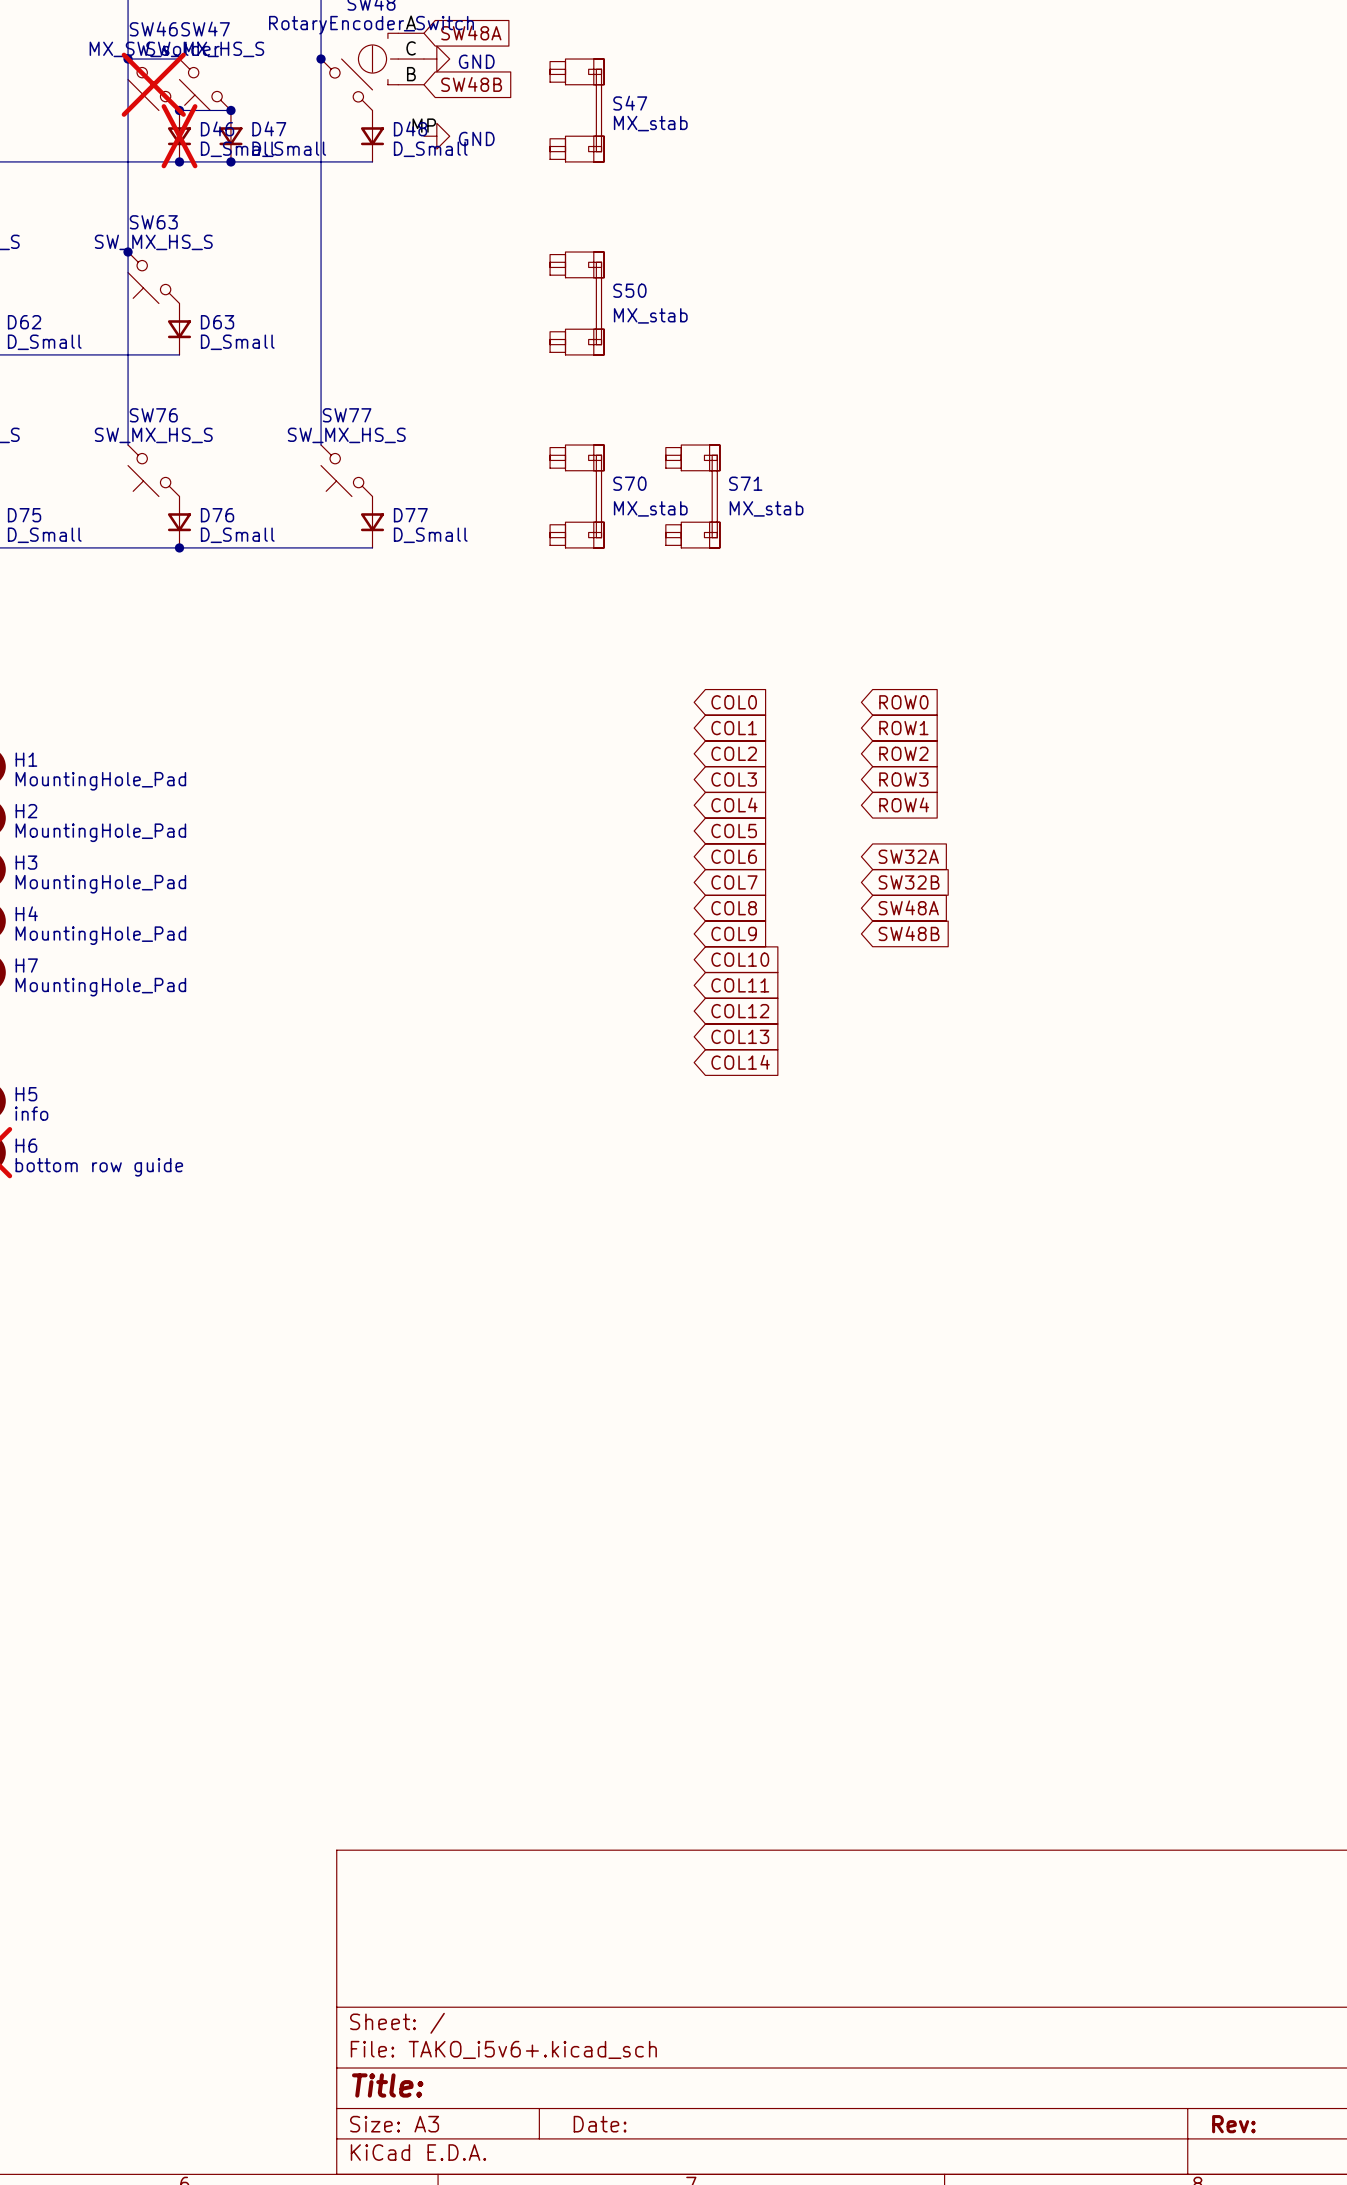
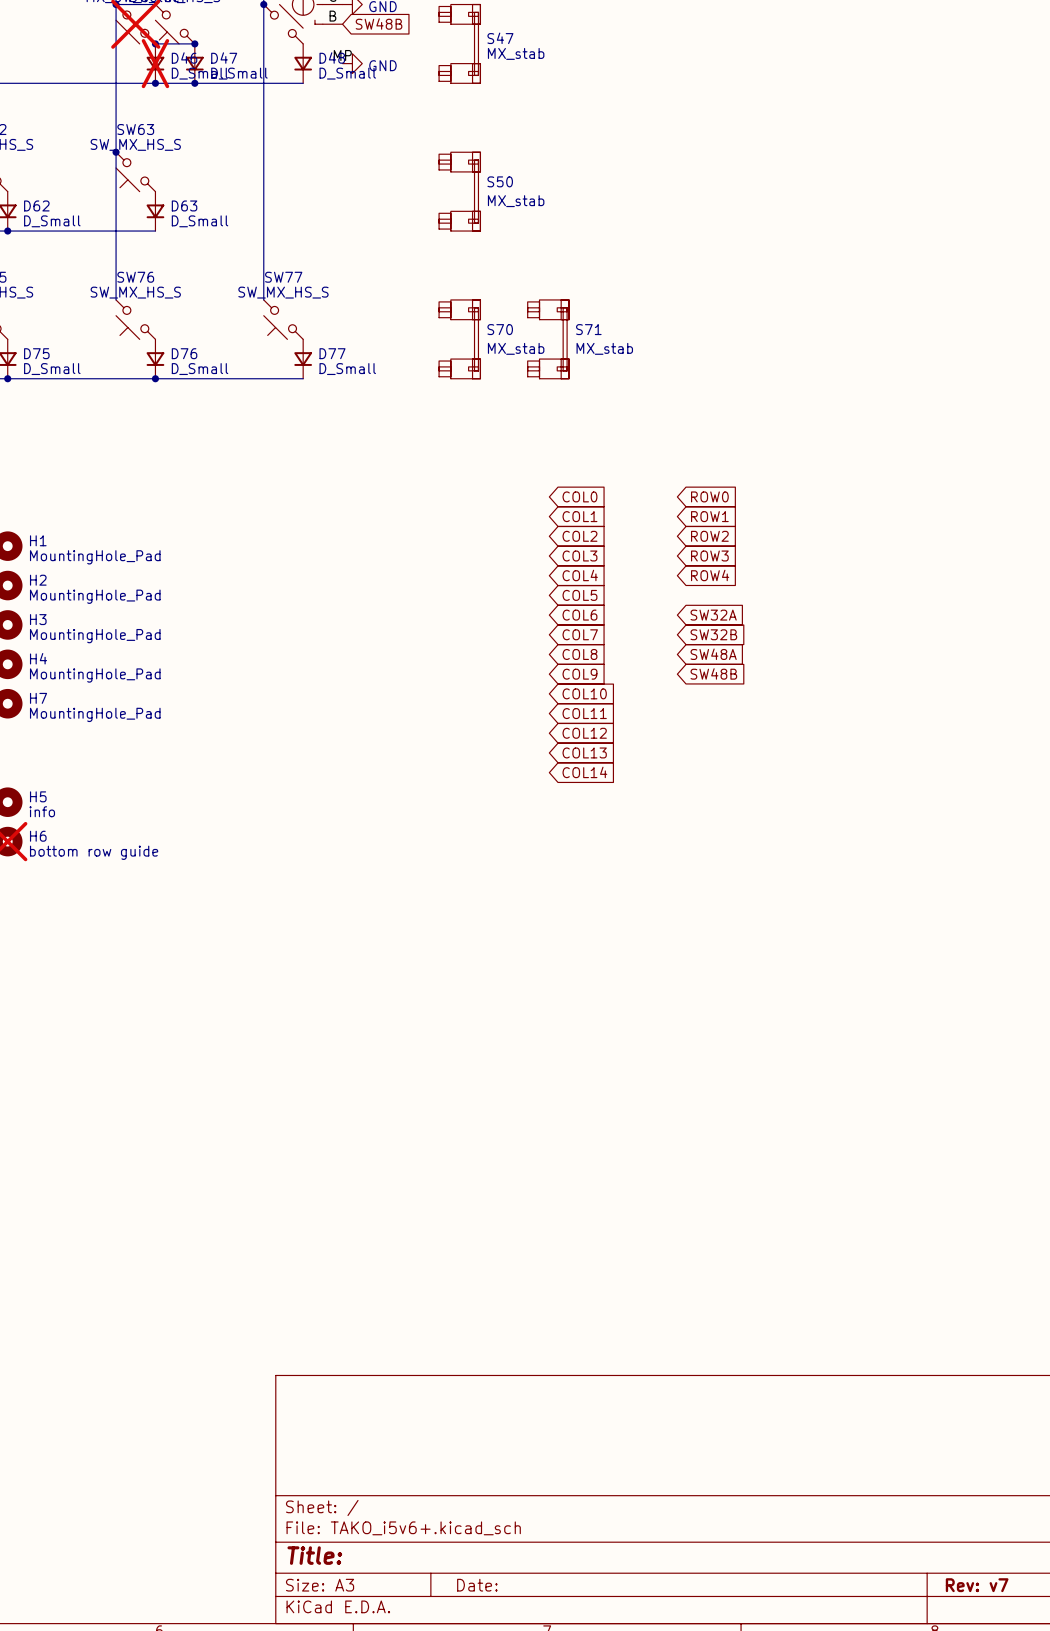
title block: Rev: (1233, 2124) -> Rev: v7 (977, 1585)

